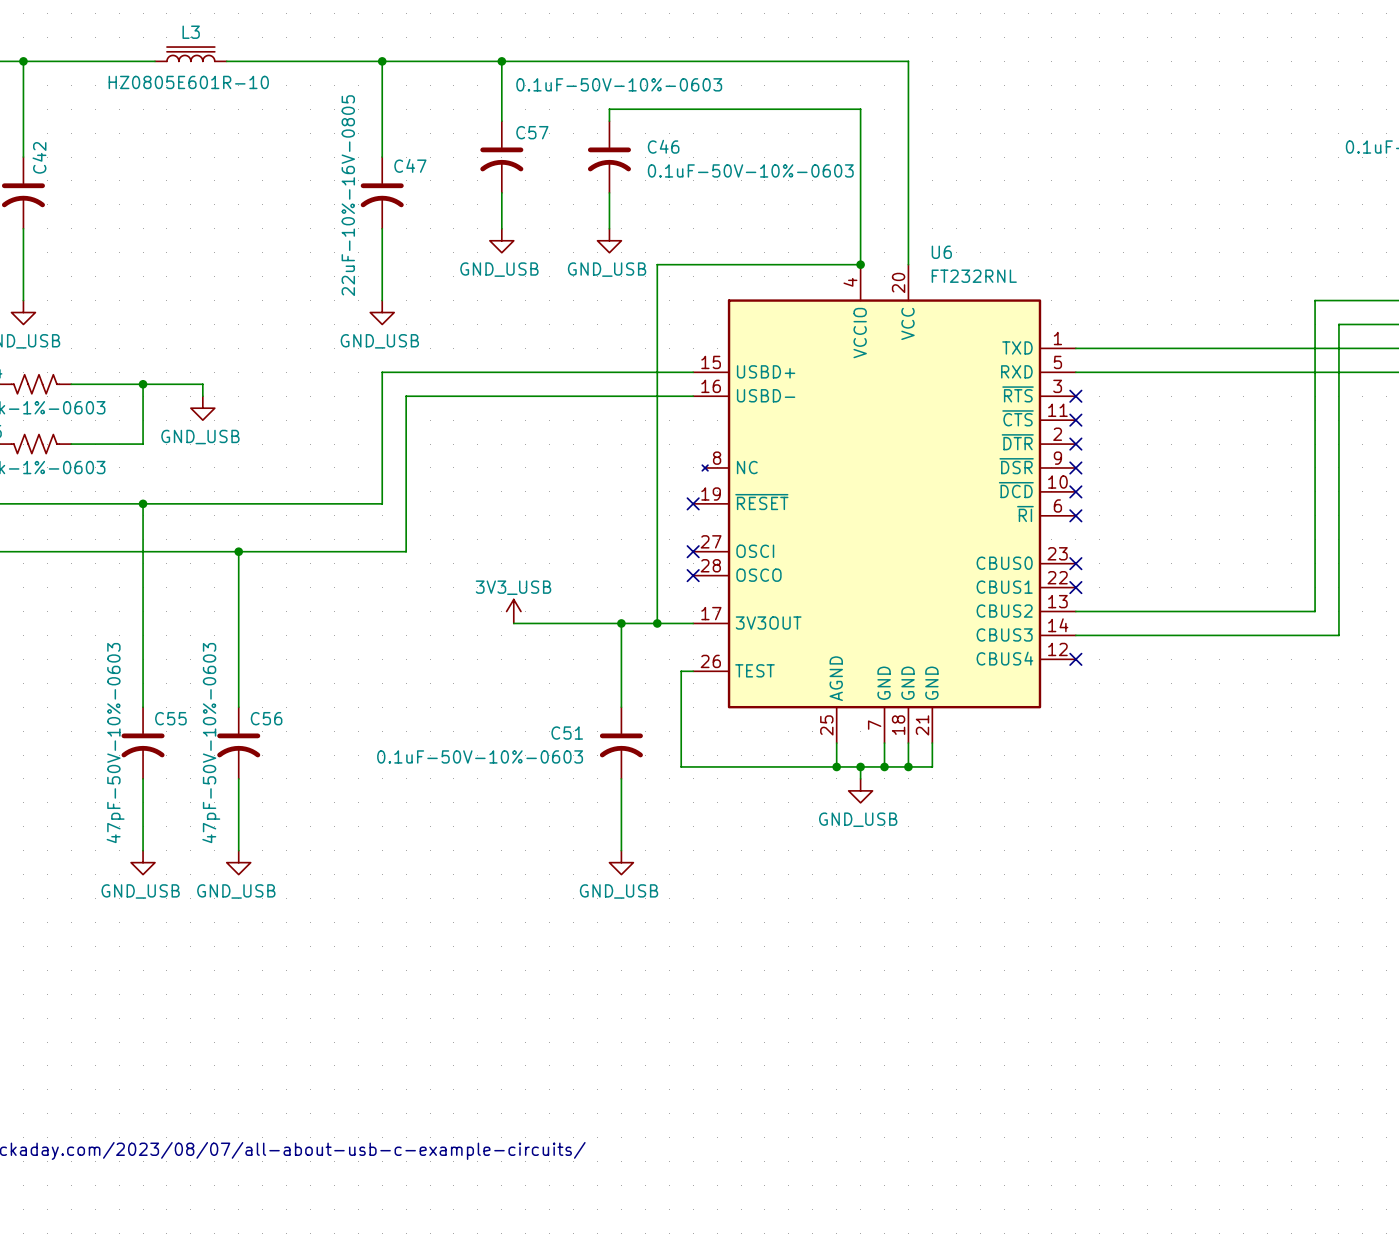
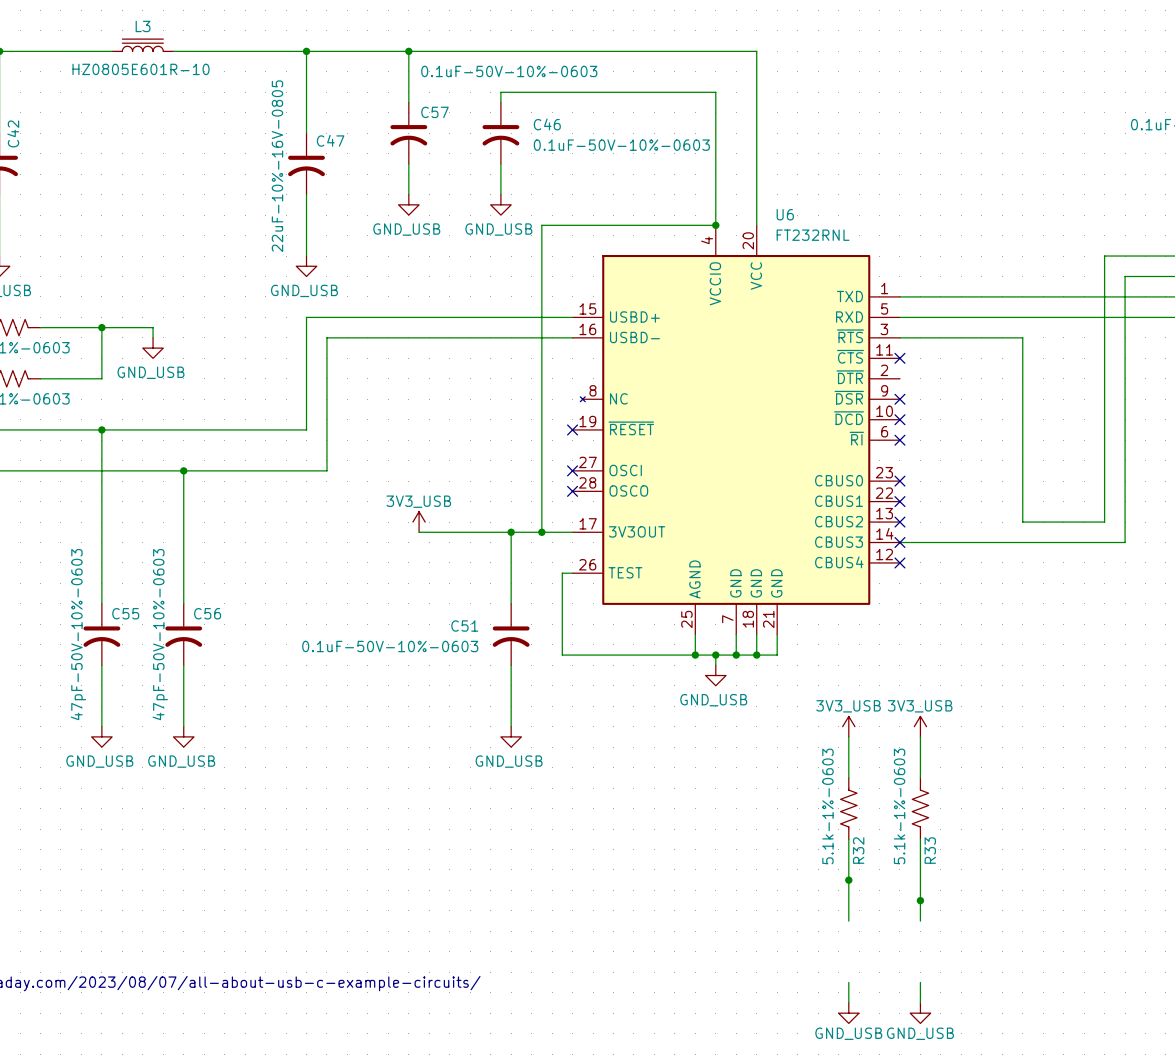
no-connect mark: (1075, 396) -> none
no-connect mark: (1075, 444) -> none
wire: (1075, 611) (1219, 611) -> (899, 337) (1022, 337) (1022, 522)
no-connect mark: none -> (899, 522)
no-connect mark: none -> (899, 542)
power symbol: none -> 3V3_USB (848, 726)
power symbol: none -> 3V3_USB (920, 726)
wire: none -> (848, 736) (848, 777)
wire: none -> (920, 736) (920, 777)
R32: none -> 5.1k-1%-0603 (848, 808)
R33: none -> 5.1k-1%-0603 (920, 808)
wire: none -> (848, 839) (848, 921)
wire: none -> (920, 839) (920, 921)
junction: none -> (848, 880)
junction: none -> (920, 900)
wire: none -> (848, 982) (848, 1002)
wire: none -> (920, 982) (920, 1002)
power symbol: none -> GND_USB (848, 1013)
power symbol: none -> GND_USB (920, 1013)

